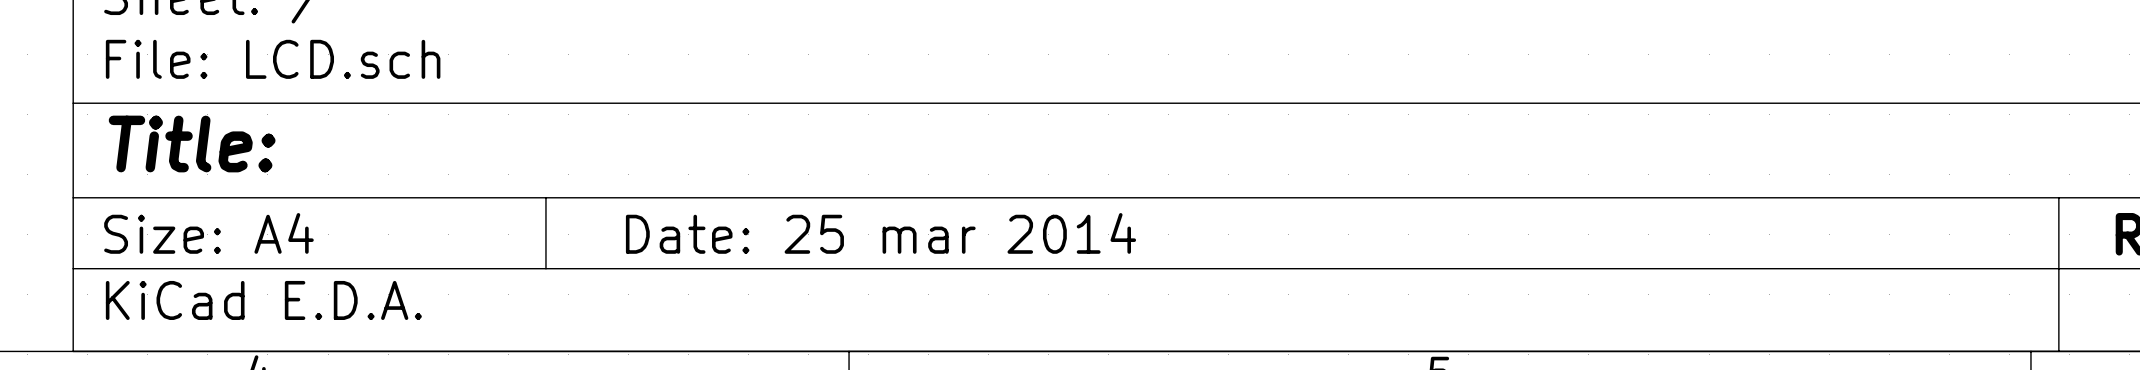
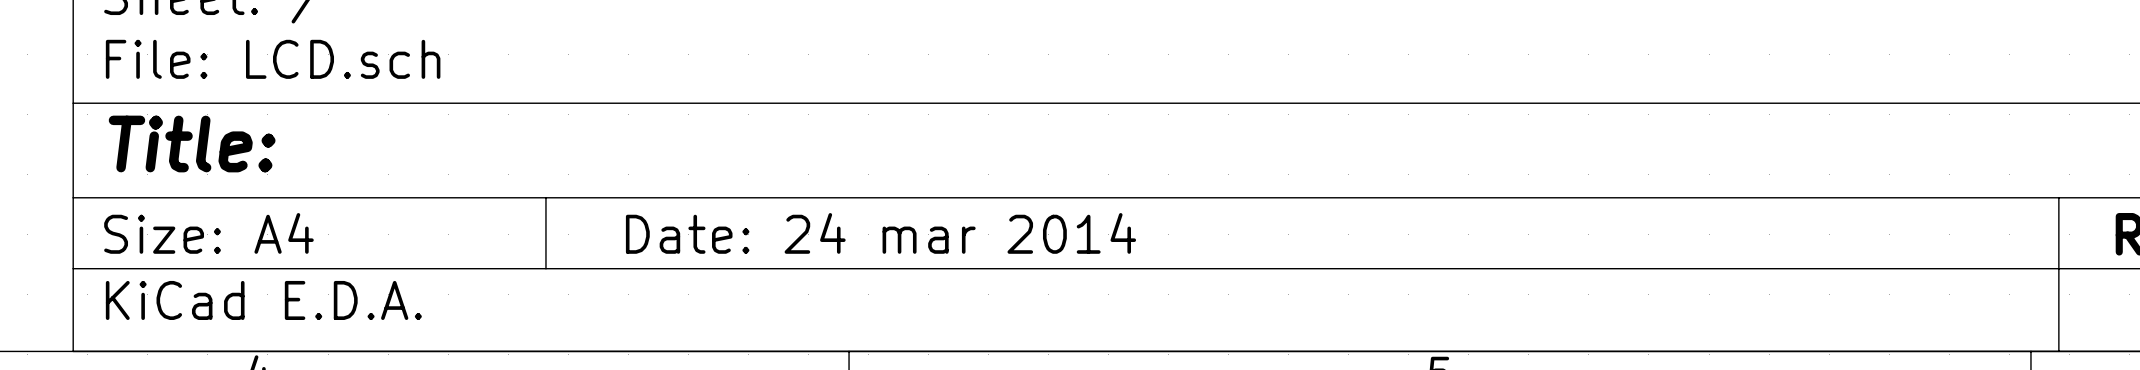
title block: Date: 25 mar 2014 (880, 233) -> Date: 24 mar 2014 (880, 233)

